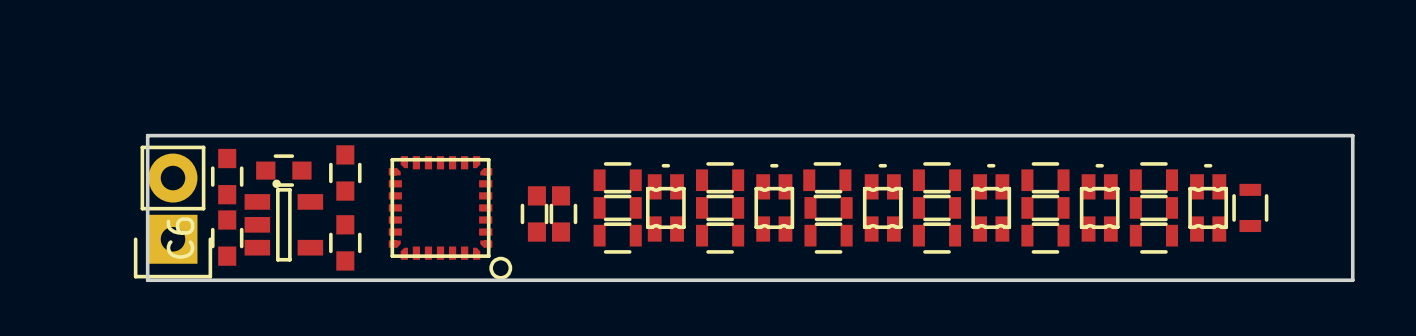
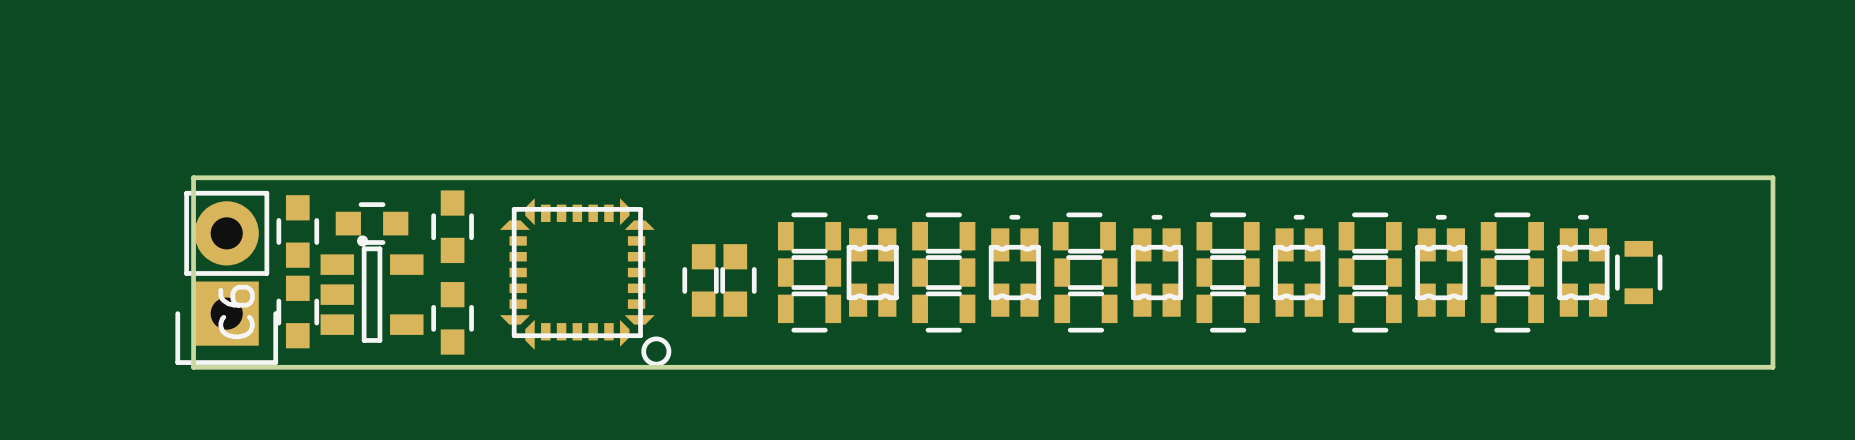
part footprint: [388, 156, 513, 280] -> [499, 198, 672, 367]

